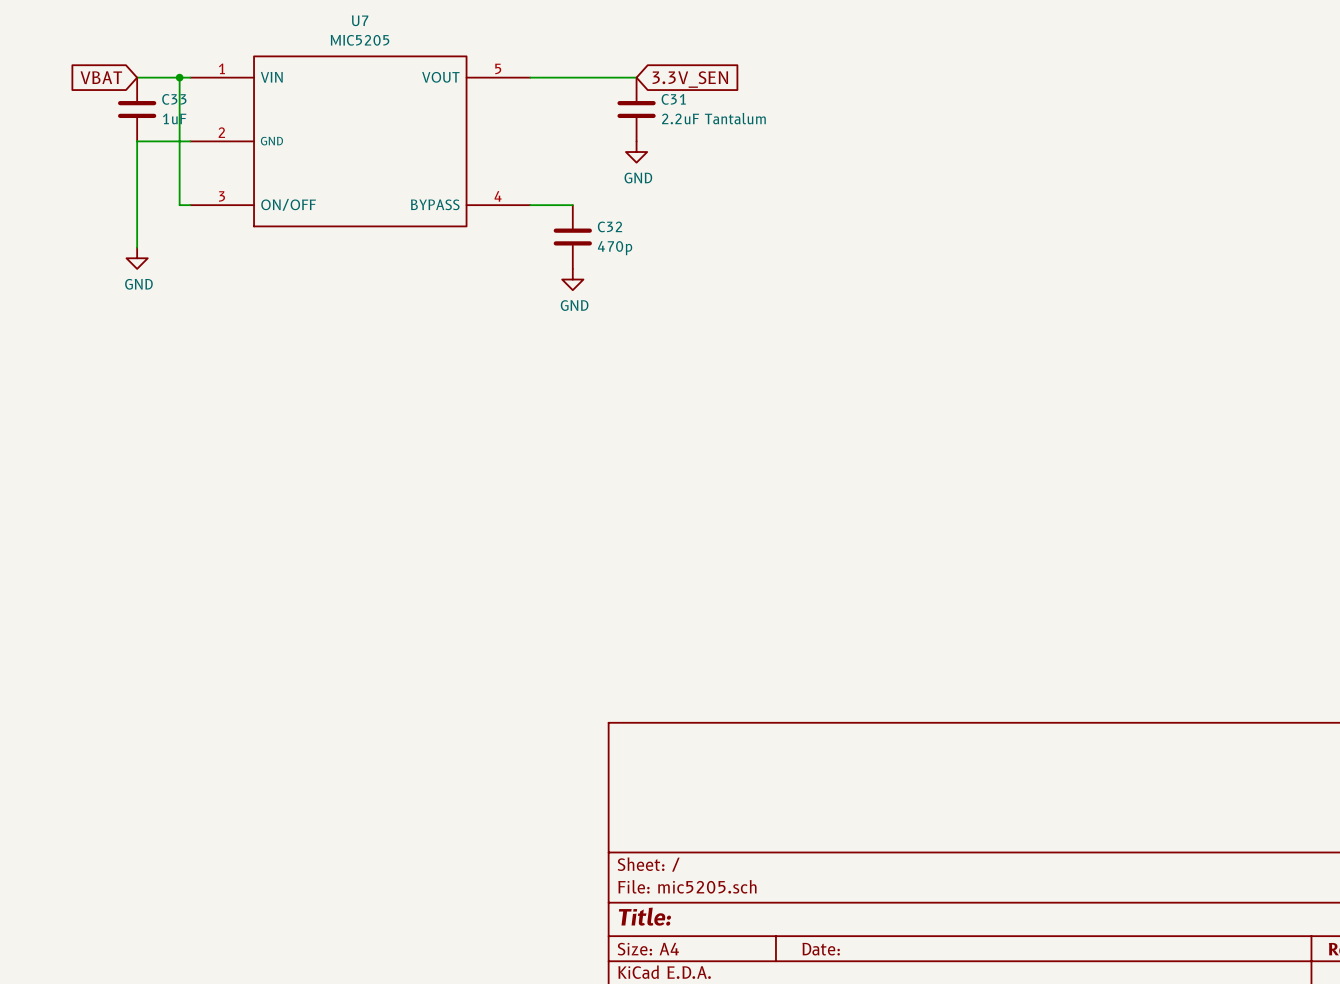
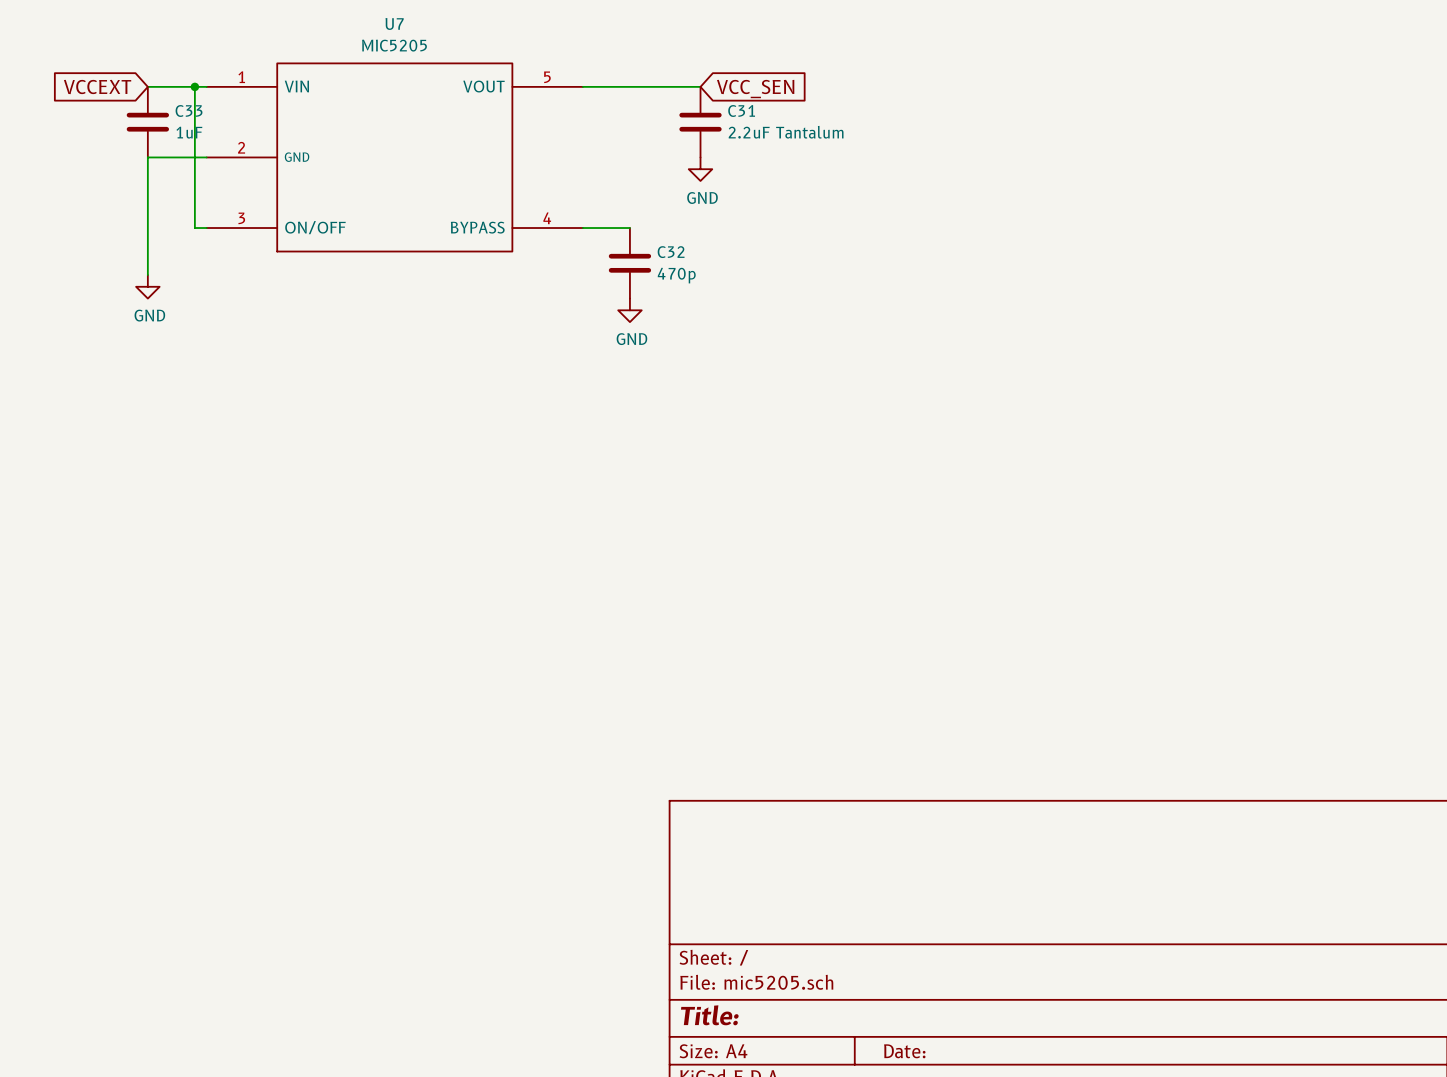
global label: VBAT (101, 77) -> VCCEXT (97, 87)
global label: 3.3V_SEN (690, 79) -> VCC_SEN (755, 89)

